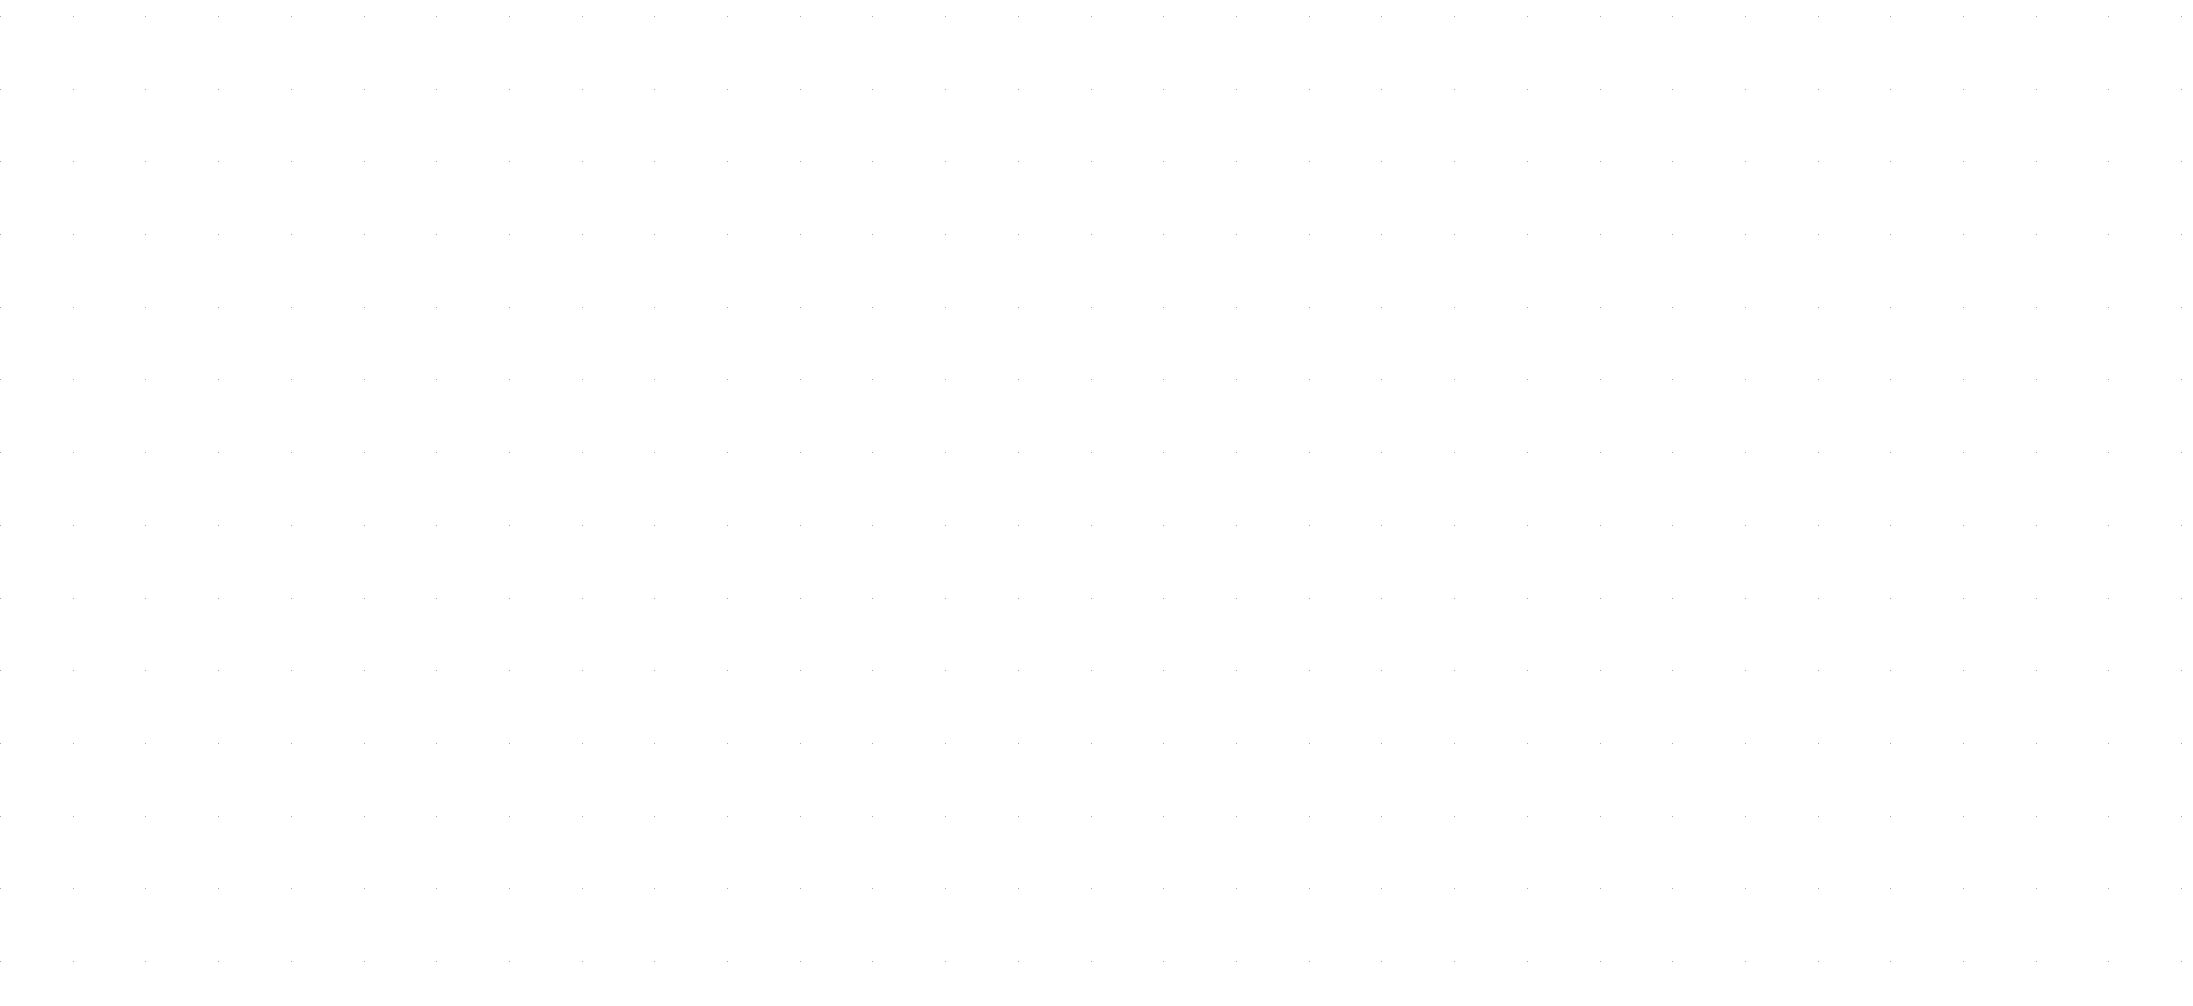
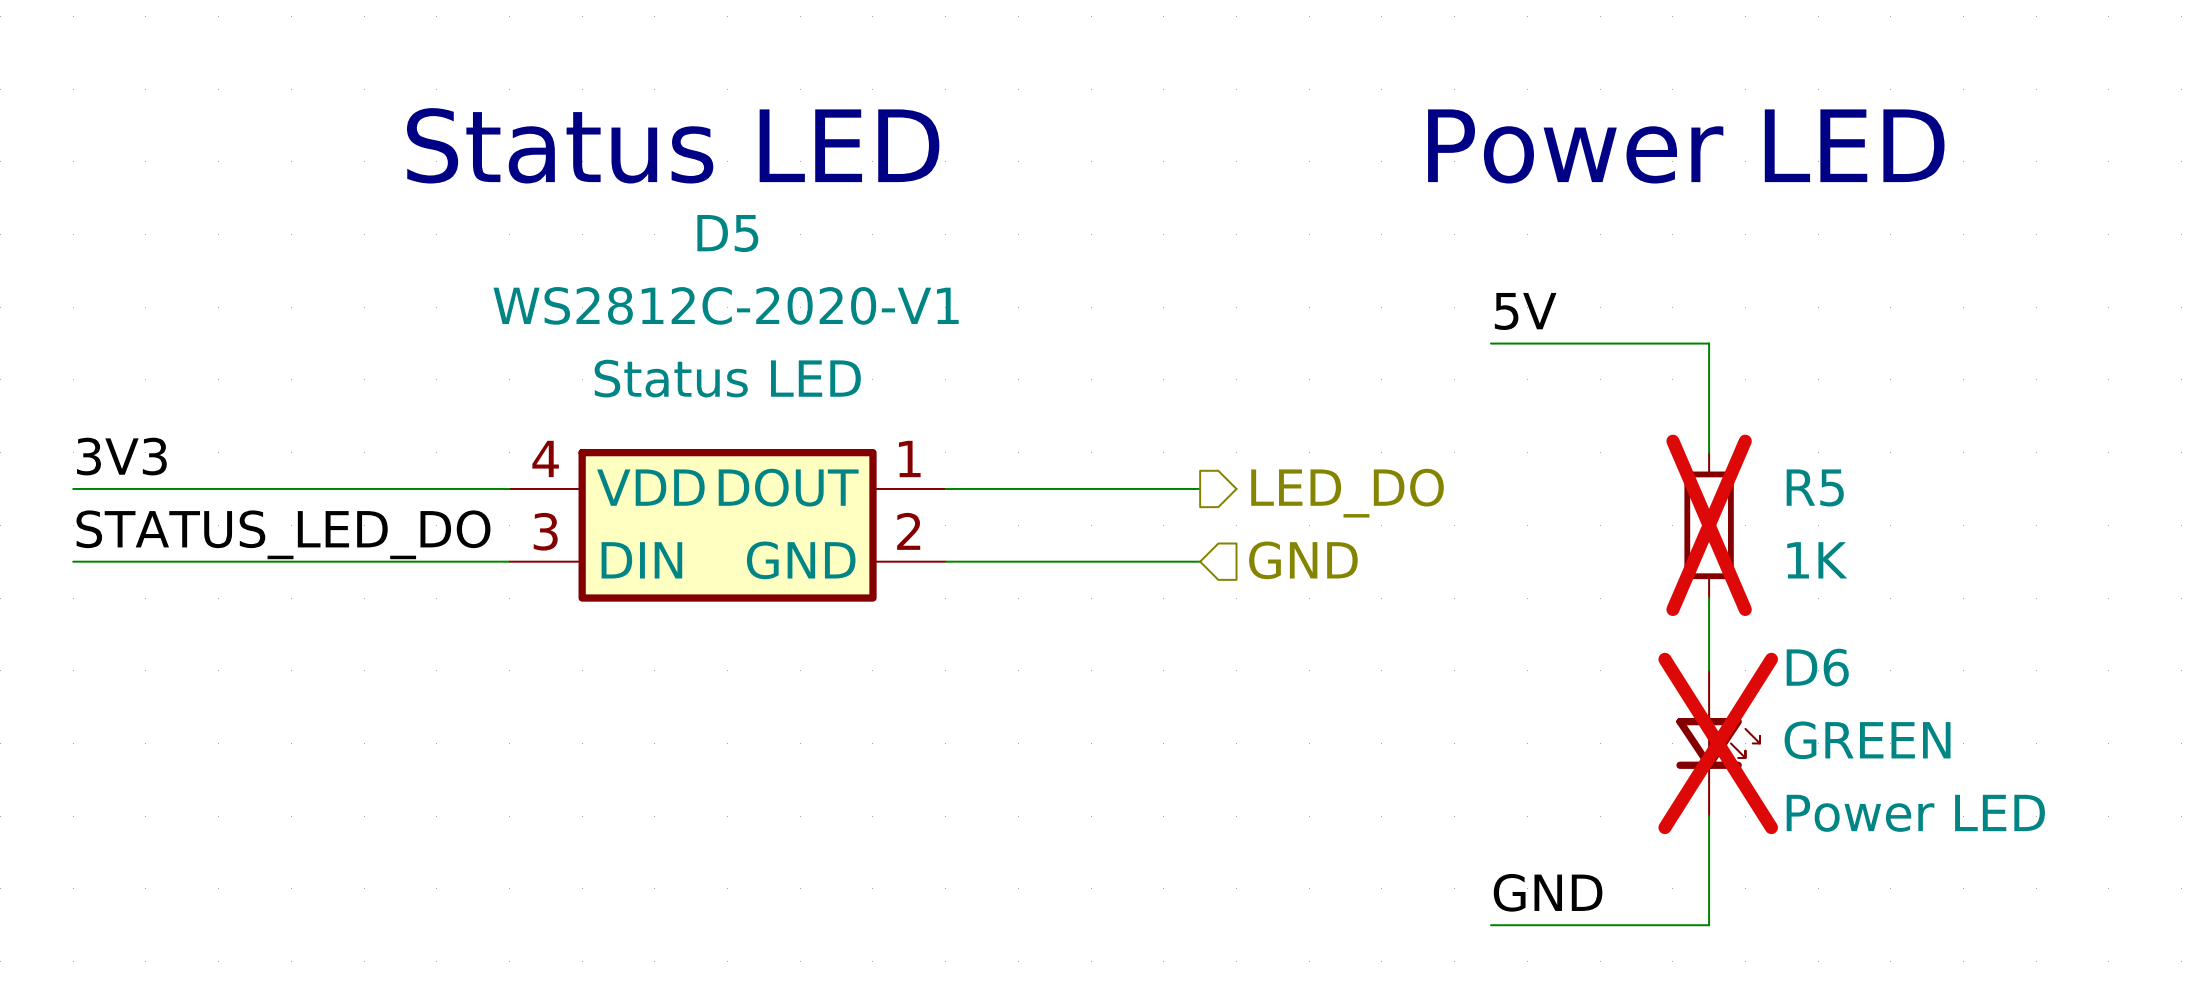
text: none -> Status LED (673, 145)
text: none -> Power LED (1686, 146)
label: none -> 5V (1525, 311)
wire: none -> (1490, 343) (1709, 343) (1709, 452)
label: none -> 3V3 (121, 456)
wire: none -> (73, 488) (509, 488)
wire: none -> (945, 488) (1200, 488)
hierarchical label: none -> LED_DO (1347, 493)
D5: none -> WS2812C-2020-V1 (727, 525)
R5: none -> 1K (1709, 525)
label: none -> STATUS_LED_DO (283, 534)
hierarchical label: none -> GND (1303, 560)
wire: none -> (73, 561) (509, 561)
wire: none -> (945, 561) (1200, 561)
wire: none -> (1709, 598) (1709, 670)
D6: none -> GREEN (1718, 743)
wire: none -> (1709, 816) (1709, 925) (1490, 925)
label: none -> GND (1548, 892)

